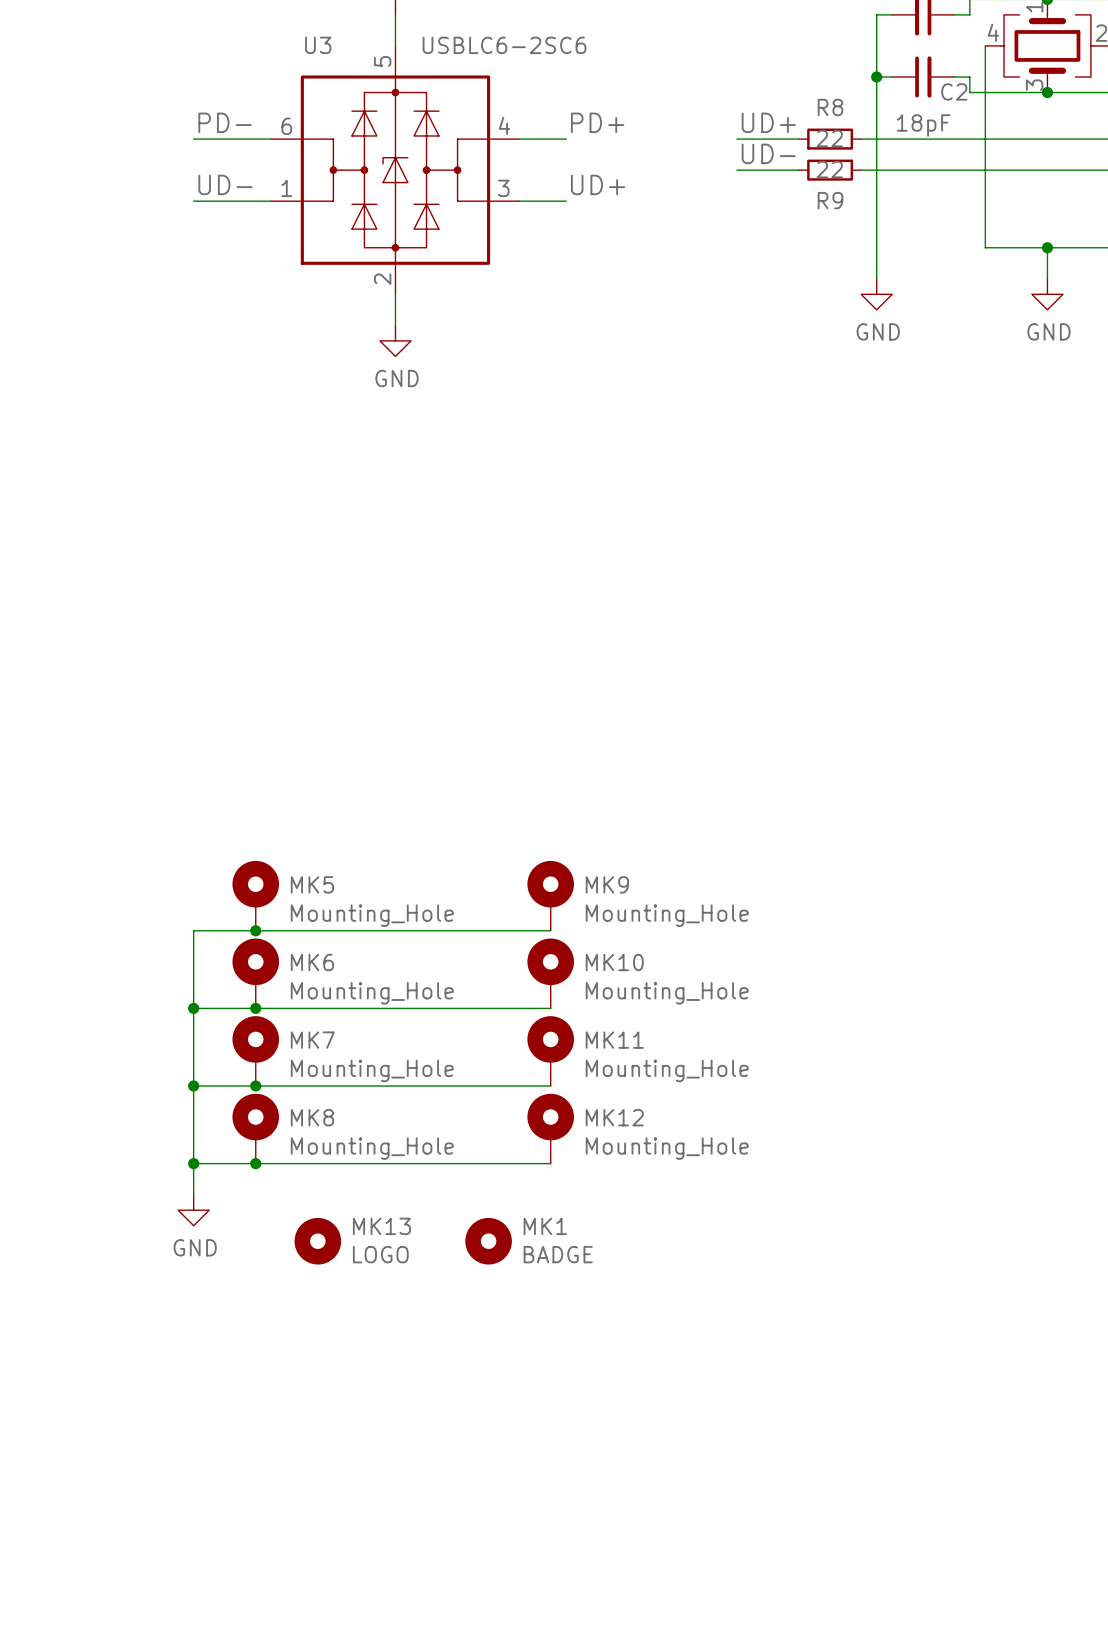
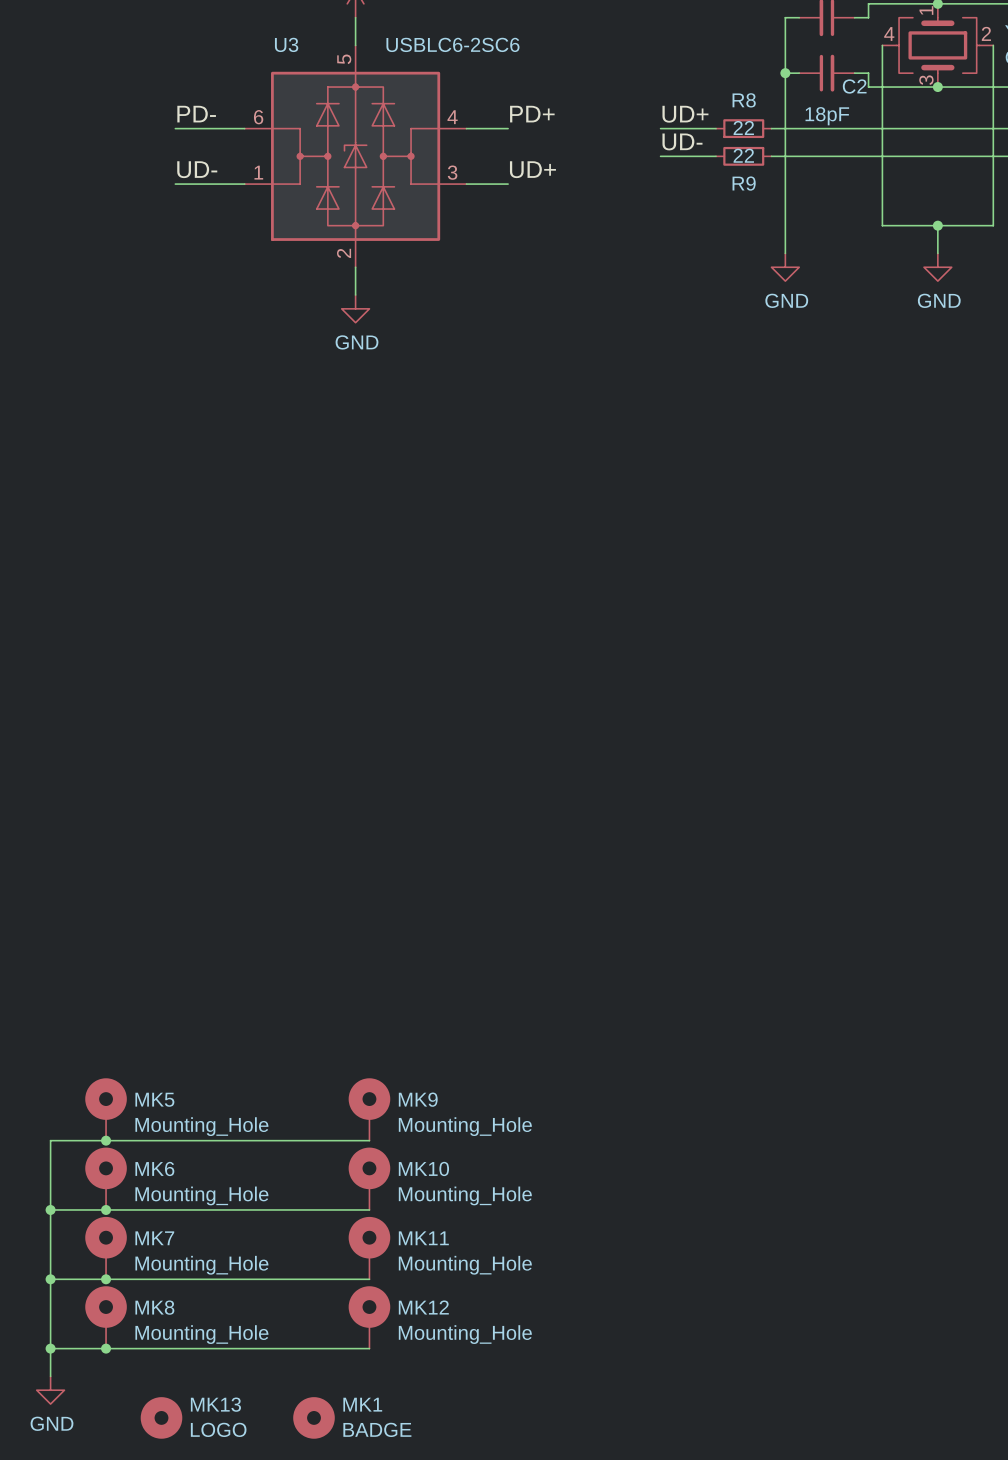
MK5 position: (255, 895) -> (106, 1109)
MK9 position: (550, 895) -> (369, 1109)
junction: (255, 930) -> none
wire: (550, 930) (193, 930) (193, 1194) -> none
MK6 position: (255, 973) -> (106, 1178)
MK10 position: (550, 973) -> (369, 1178)
wire: (193, 1008) (550, 1008) -> none
junction: (193, 1008) -> none
junction: (255, 1008) -> none
MK7 position: (255, 1051) -> (106, 1248)
MK11 position: (550, 1051) -> (369, 1248)
wire: (193, 1086) (550, 1086) -> (50, 1209) (369, 1209)
junction: (193, 1086) -> none
junction: (255, 1086) -> none
MK8 position: (255, 1128) -> (106, 1317)
MK12 position: (550, 1128) -> (369, 1317)
wire: (193, 1163) (550, 1163) -> (50, 1279) (369, 1279)
junction: (193, 1163) -> none
junction: (255, 1163) -> none
power symbol: GND (193, 1210) -> none
MK13 position: (317, 1241) -> (161, 1417)
MK1 position: (488, 1241) -> (313, 1417)
junction: none -> (106, 1140)
wire: none -> (369, 1140) (50, 1140) (50, 1376)
junction: none -> (50, 1209)
junction: none -> (106, 1209)
junction: none -> (50, 1279)
junction: none -> (106, 1279)
wire: none -> (50, 1348) (369, 1348)
junction: none -> (50, 1348)
junction: none -> (106, 1348)
power symbol: none -> GND (50, 1390)

